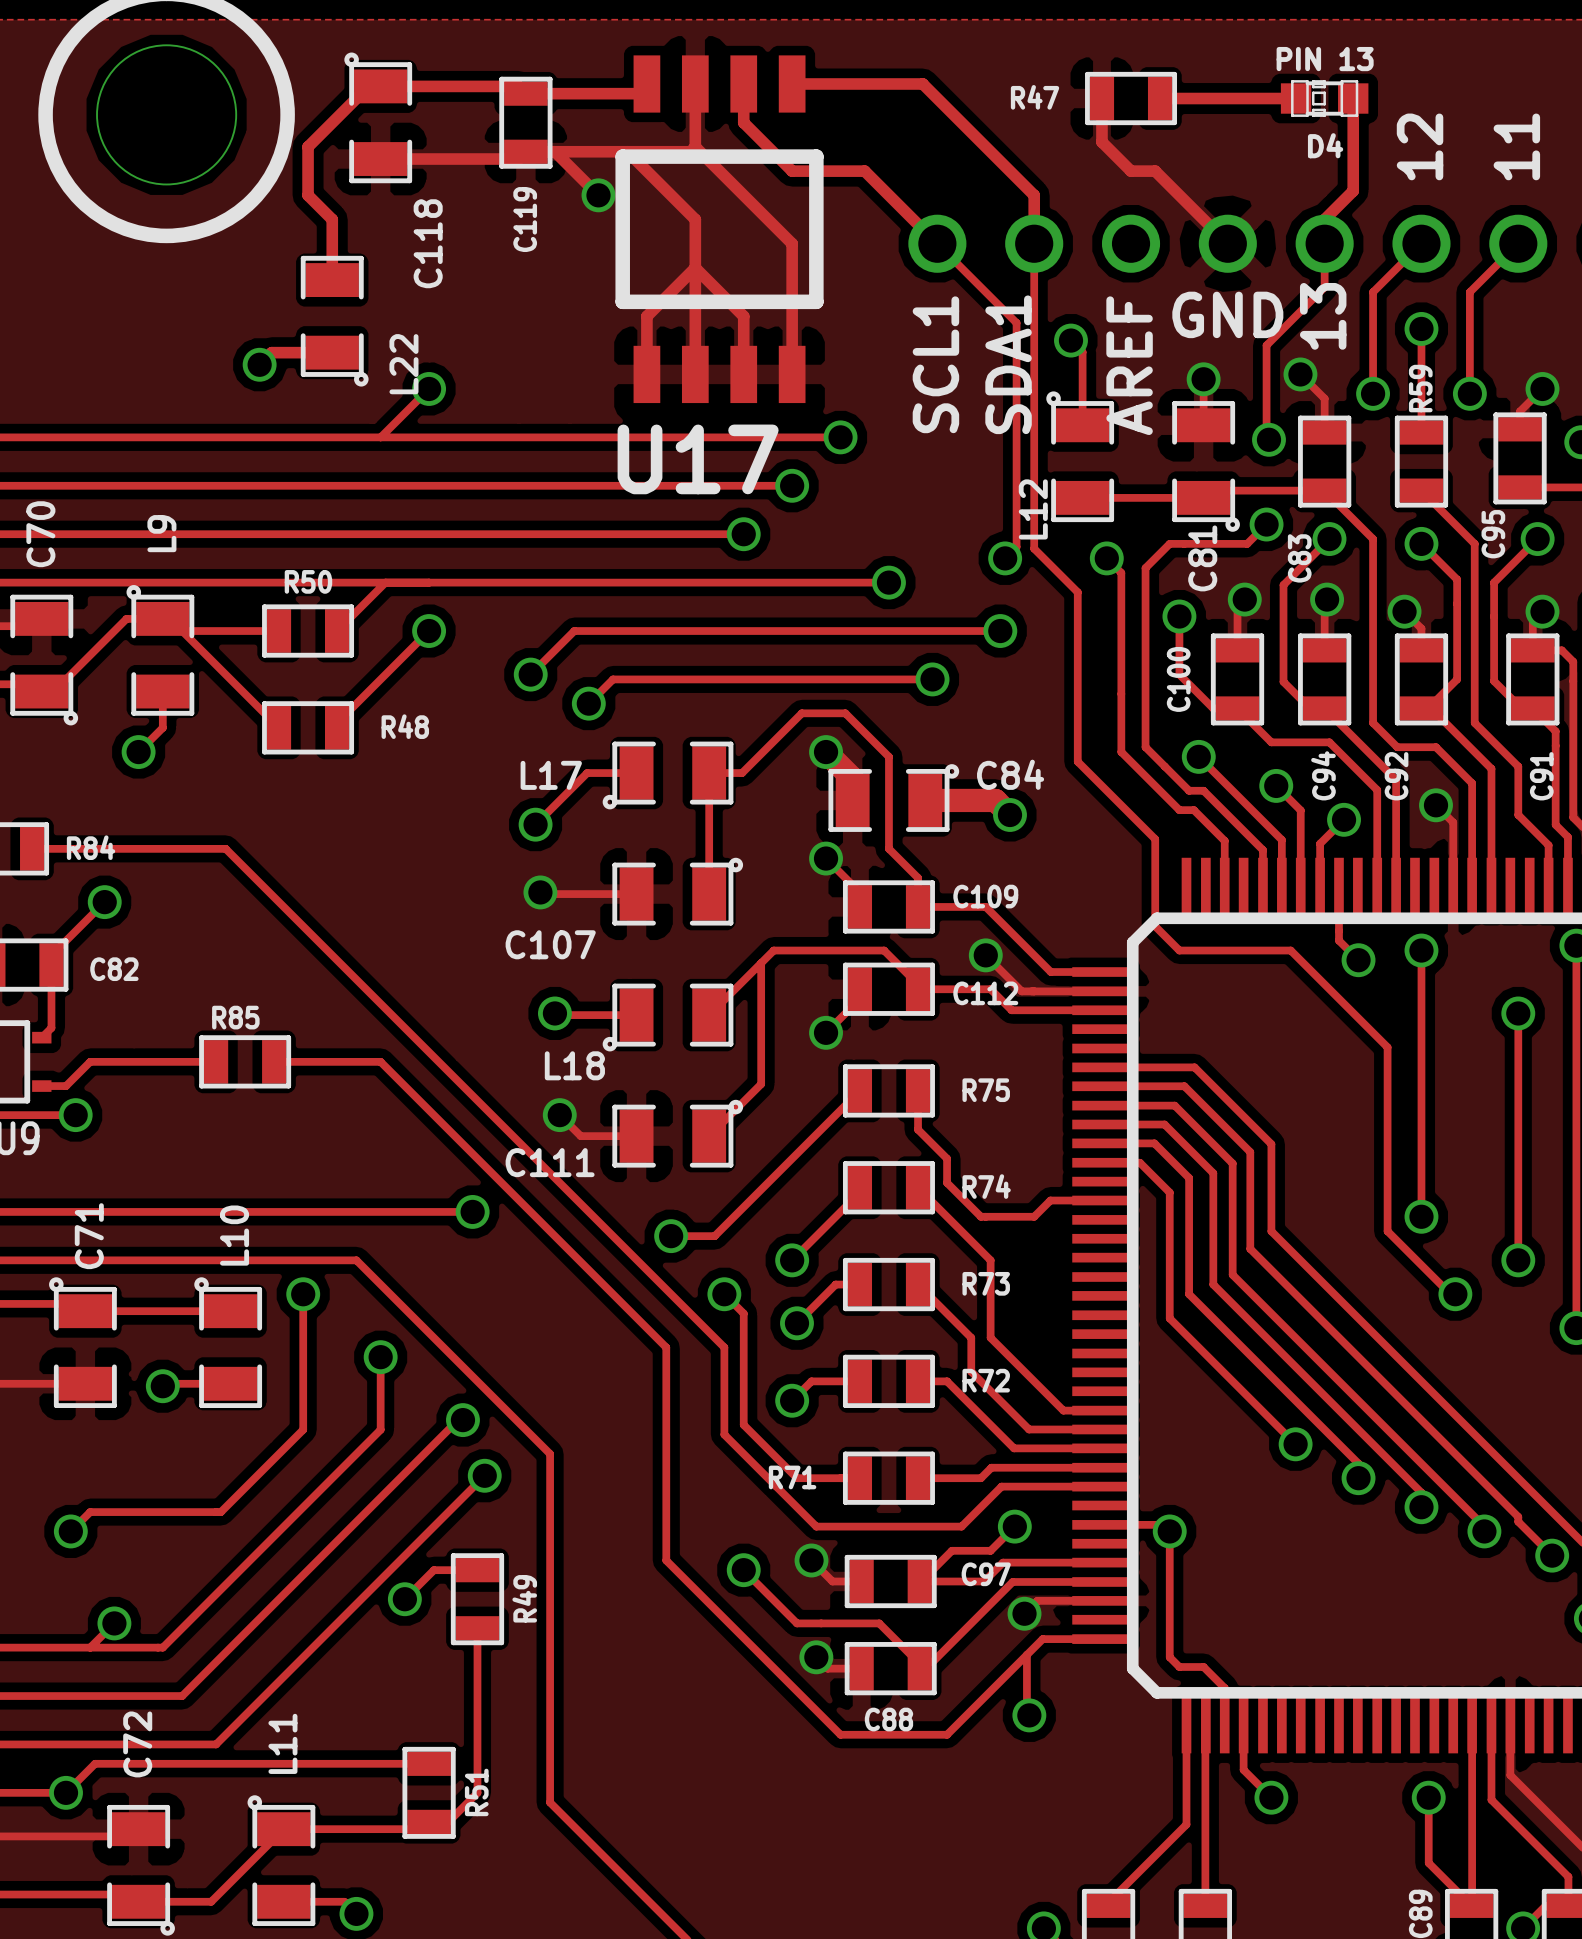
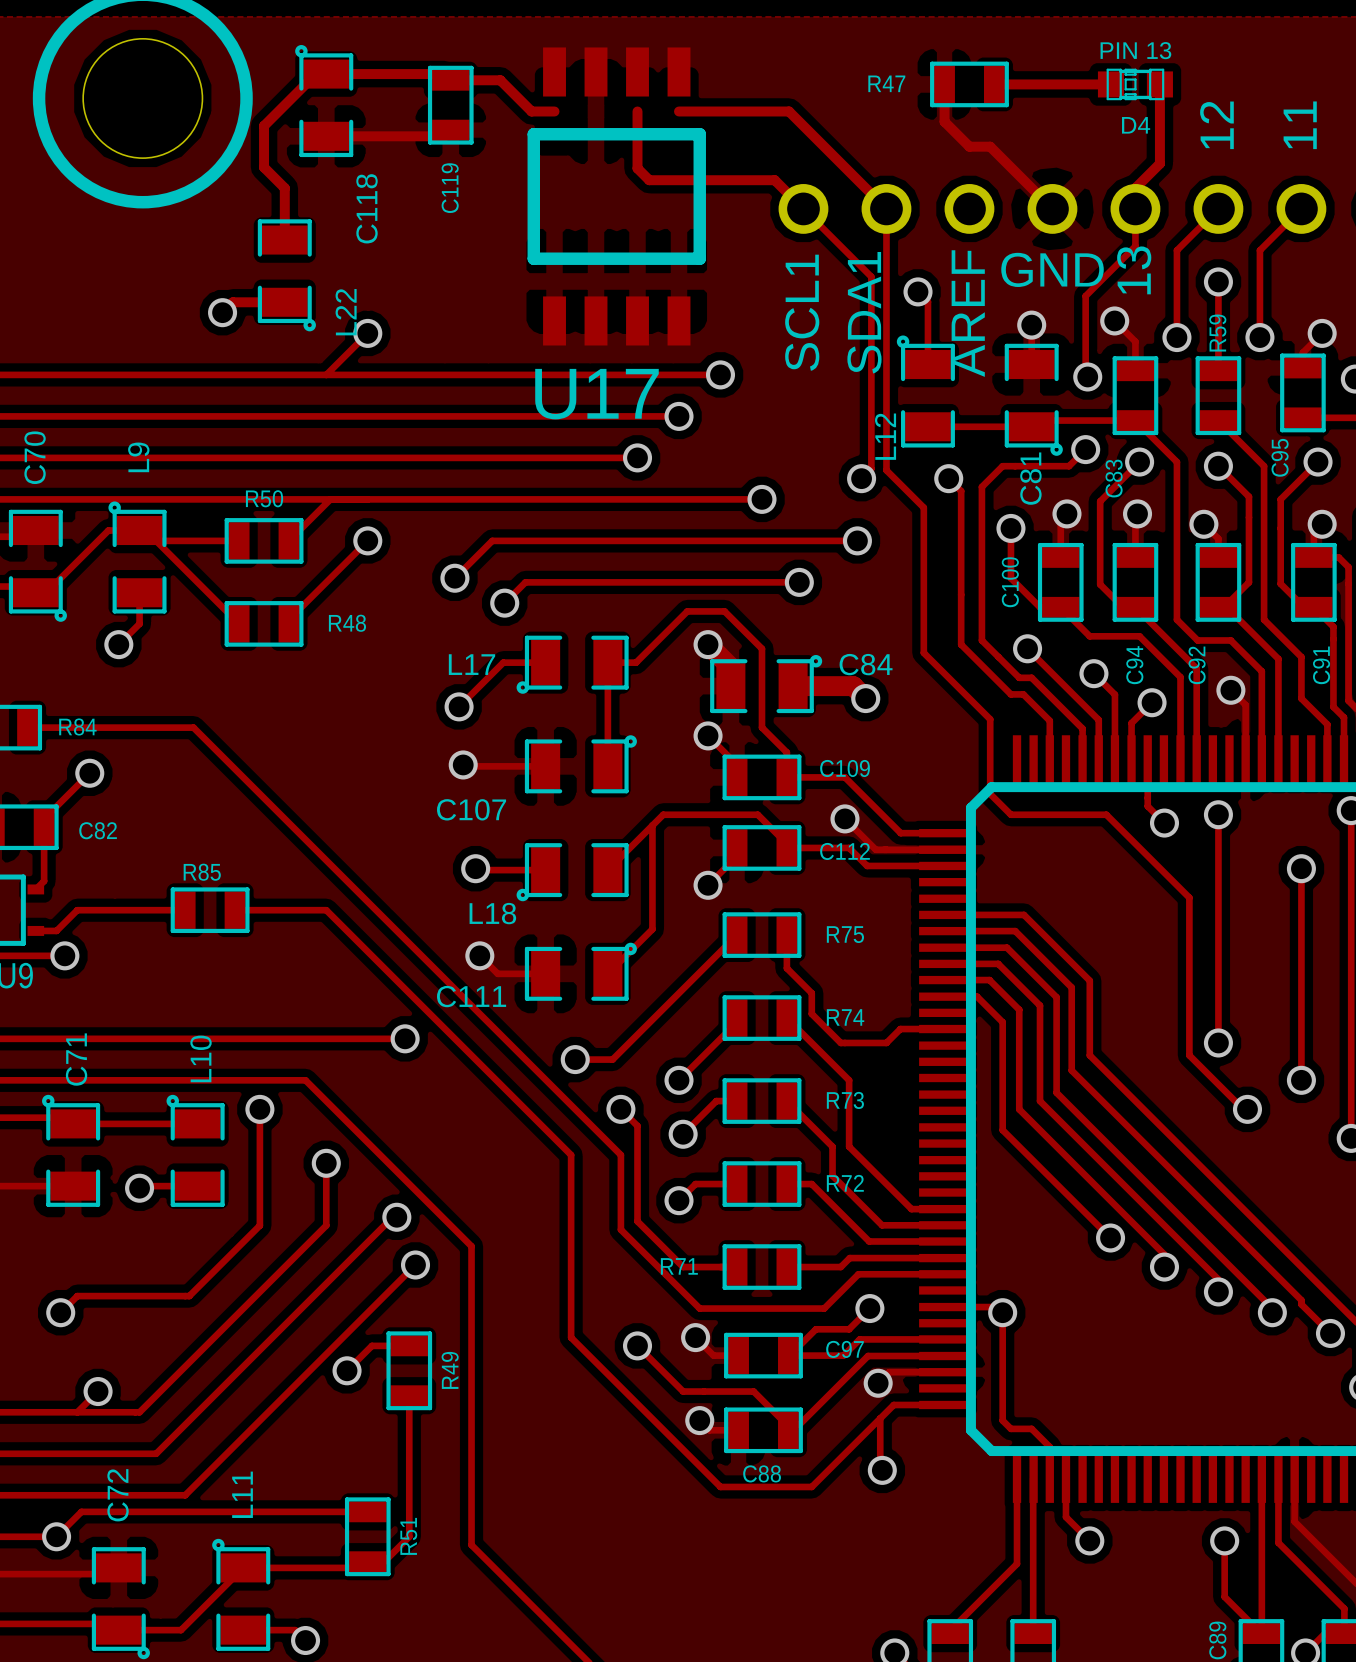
track: (646, 83) (637, 93) (583, 93) -> (554, 111) (531, 111) (500, 80)
track: (695, 83) (695, 146) -> none
track: (743, 83) (743, 122) (792, 171) (864, 171) (903, 210) -> (637, 111) (637, 168) (649, 180) (774, 180)
track: (792, 83) (922, 83) (1034, 195) (1034, 243) -> (679, 111) (789, 111) (886, 208)
track: (695, 146) (792, 243) (792, 374) -> none
track: (695, 146) (690, 151) (525, 151) -> none
track: (554, 151) (598, 195) -> none
track: (627, 151) (695, 219) (695, 374) -> none
via: (598, 195) -> none
track: (646, 374) (646, 316) (695, 267) (743, 316) (743, 374) -> none

